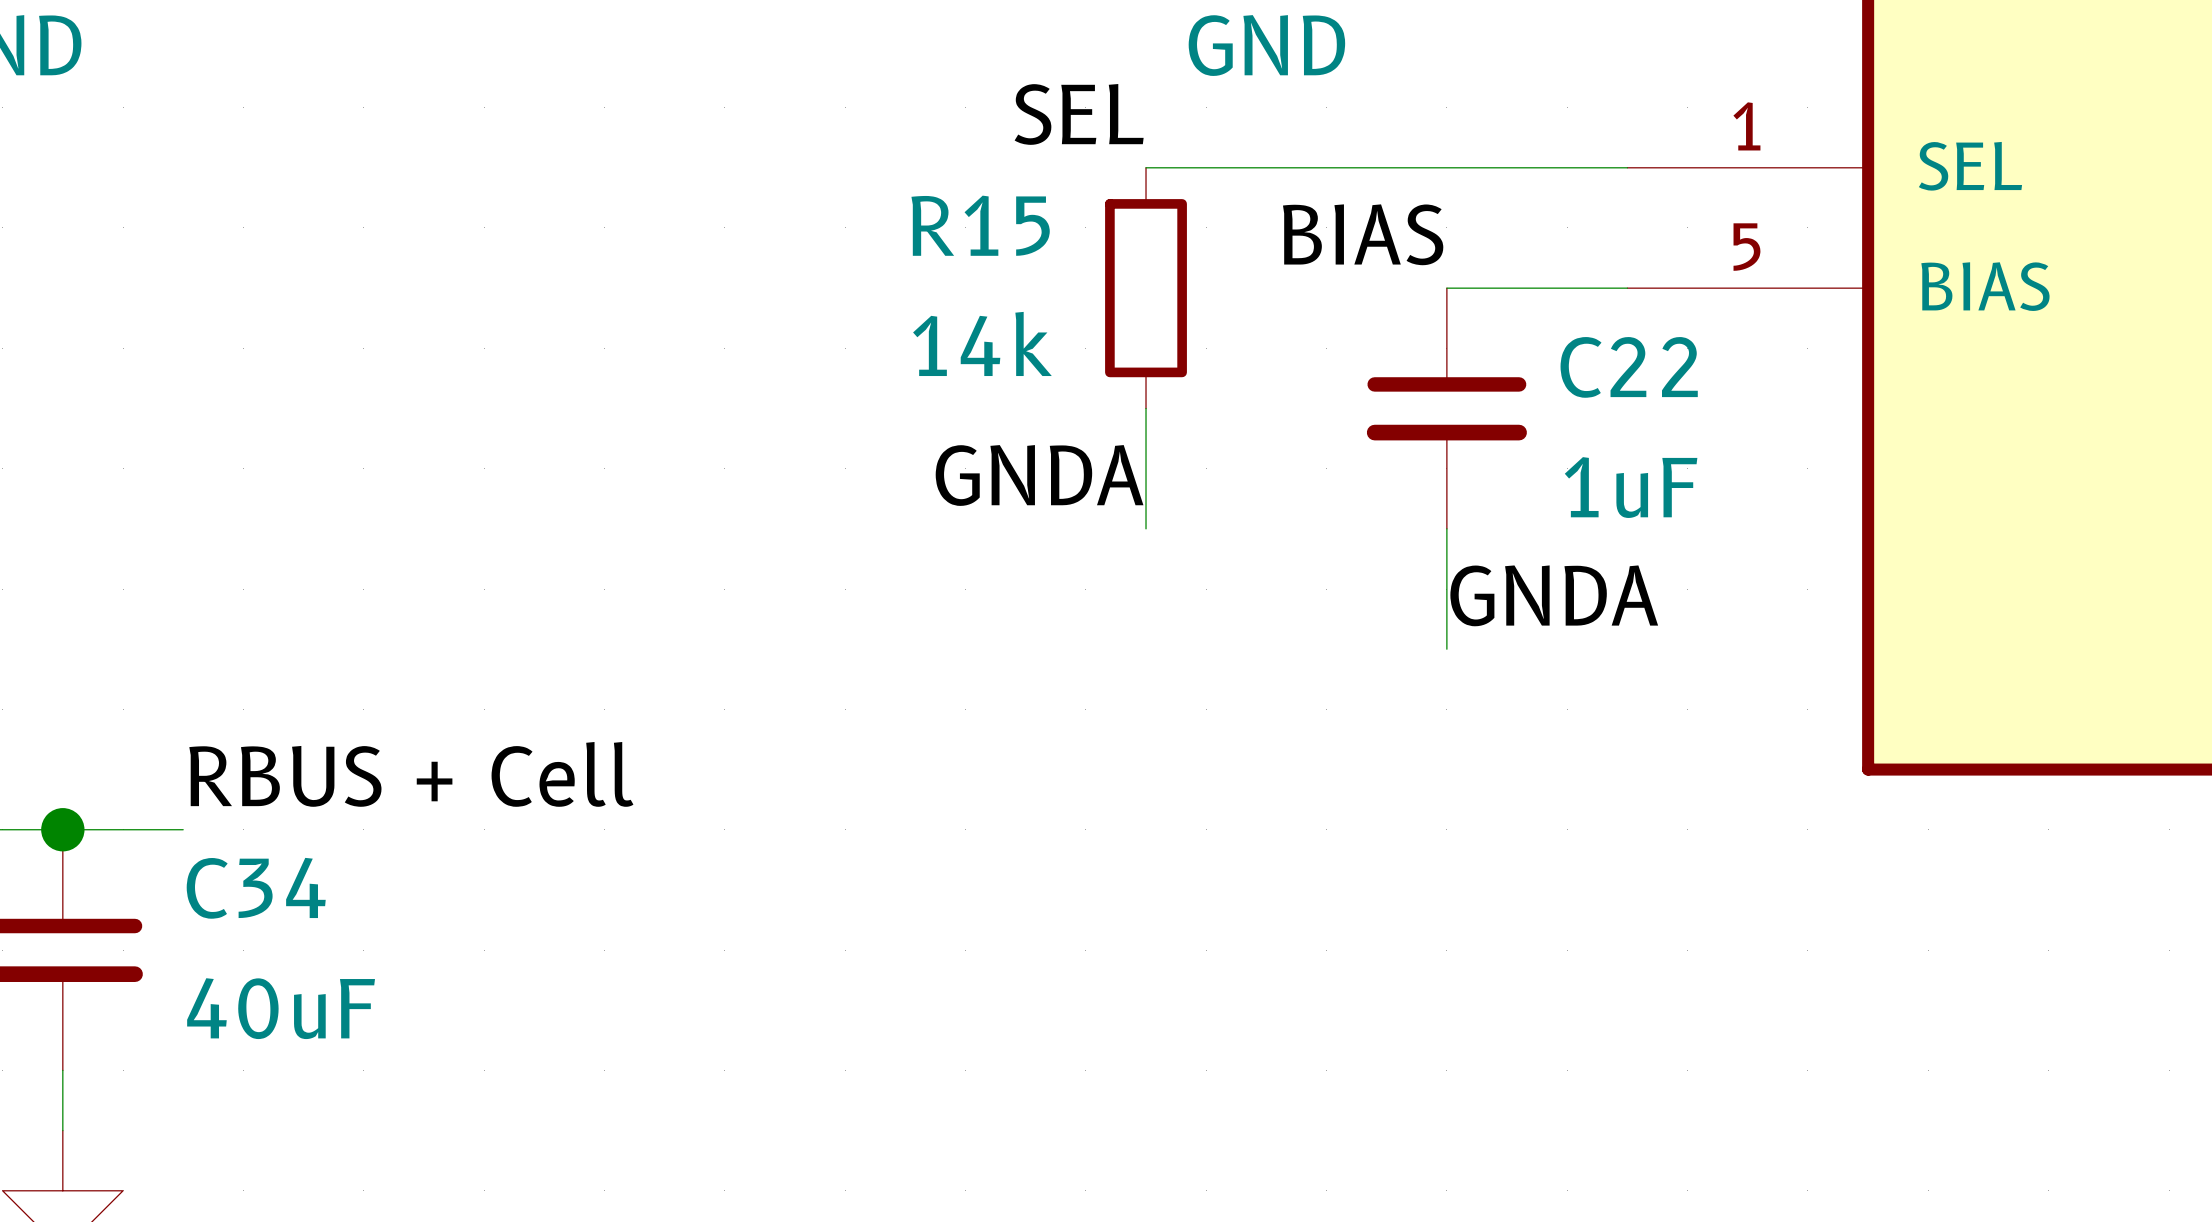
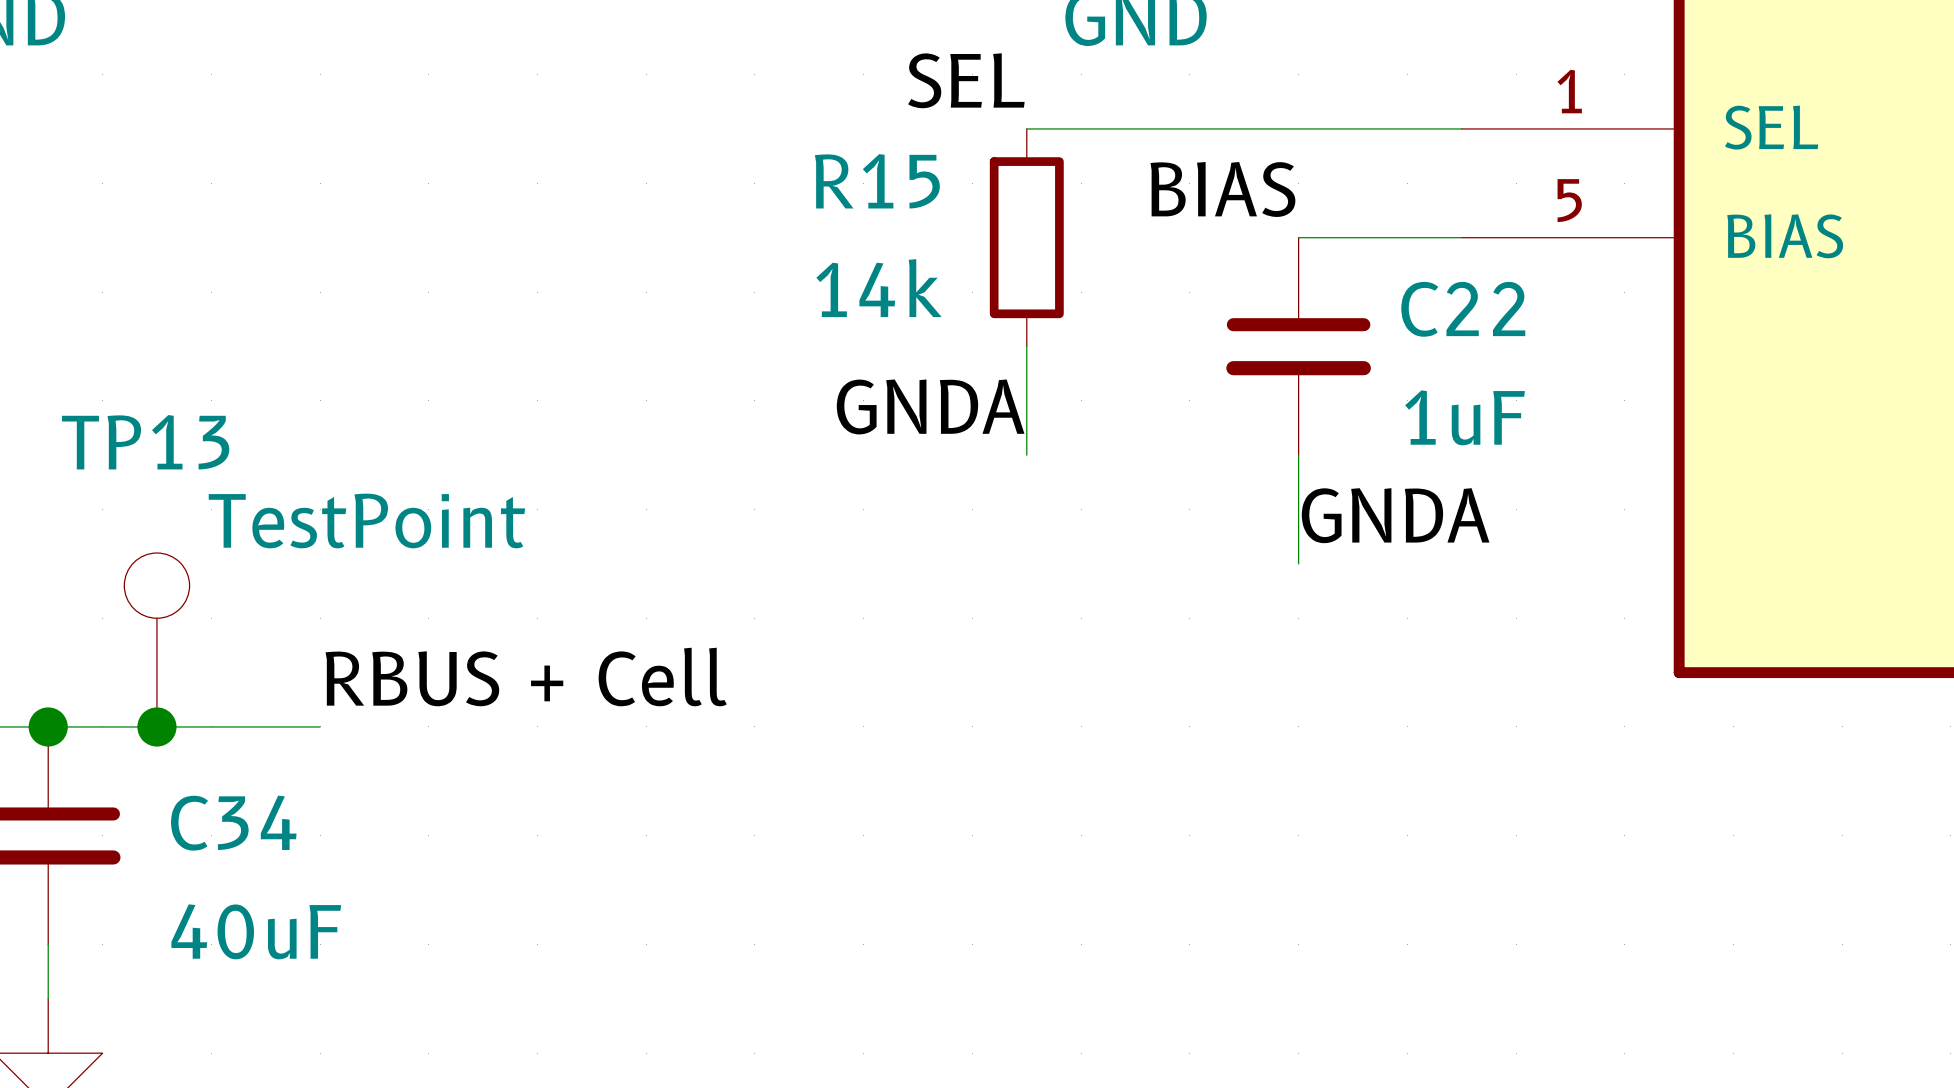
TP13: none -> TestPoint (156, 640)
label position: RBUS + Cell (411, 774) -> RBUS + Cell (526, 676)
wire: none -> (156, 726) (320, 726)
junction: none -> (156, 726)
C34 name position: C34 (256, 888) -> C34 (233, 823)
C34 value position: 40uF (281, 1008) -> 40uF (256, 931)

